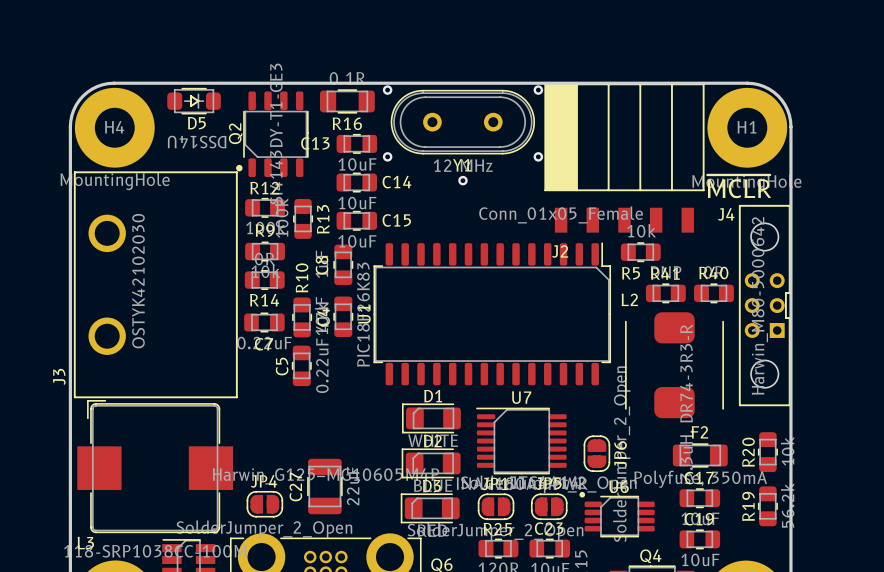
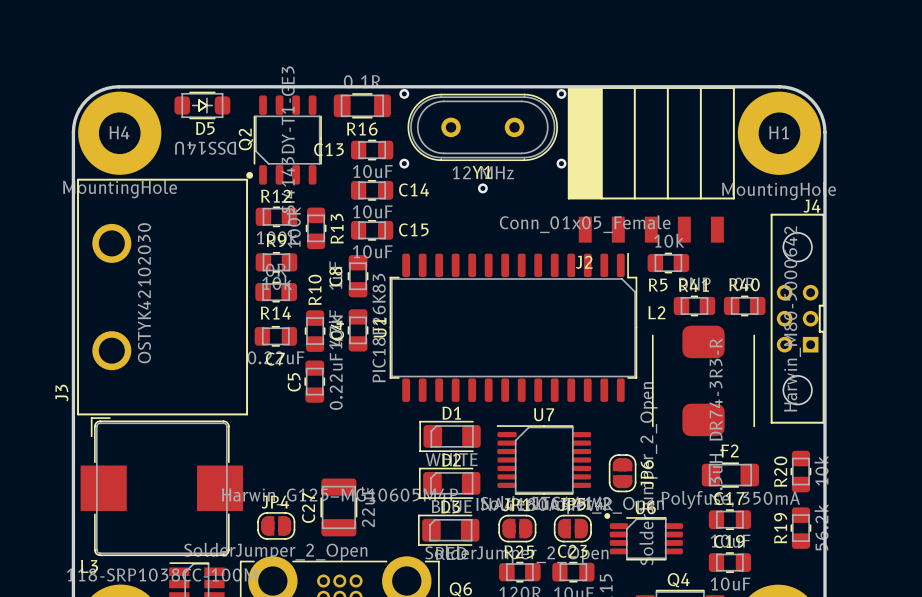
text: ~{MCLR} (739, 186) -> none
J4 name position: J4 (726, 214) -> J4 (811, 206)

